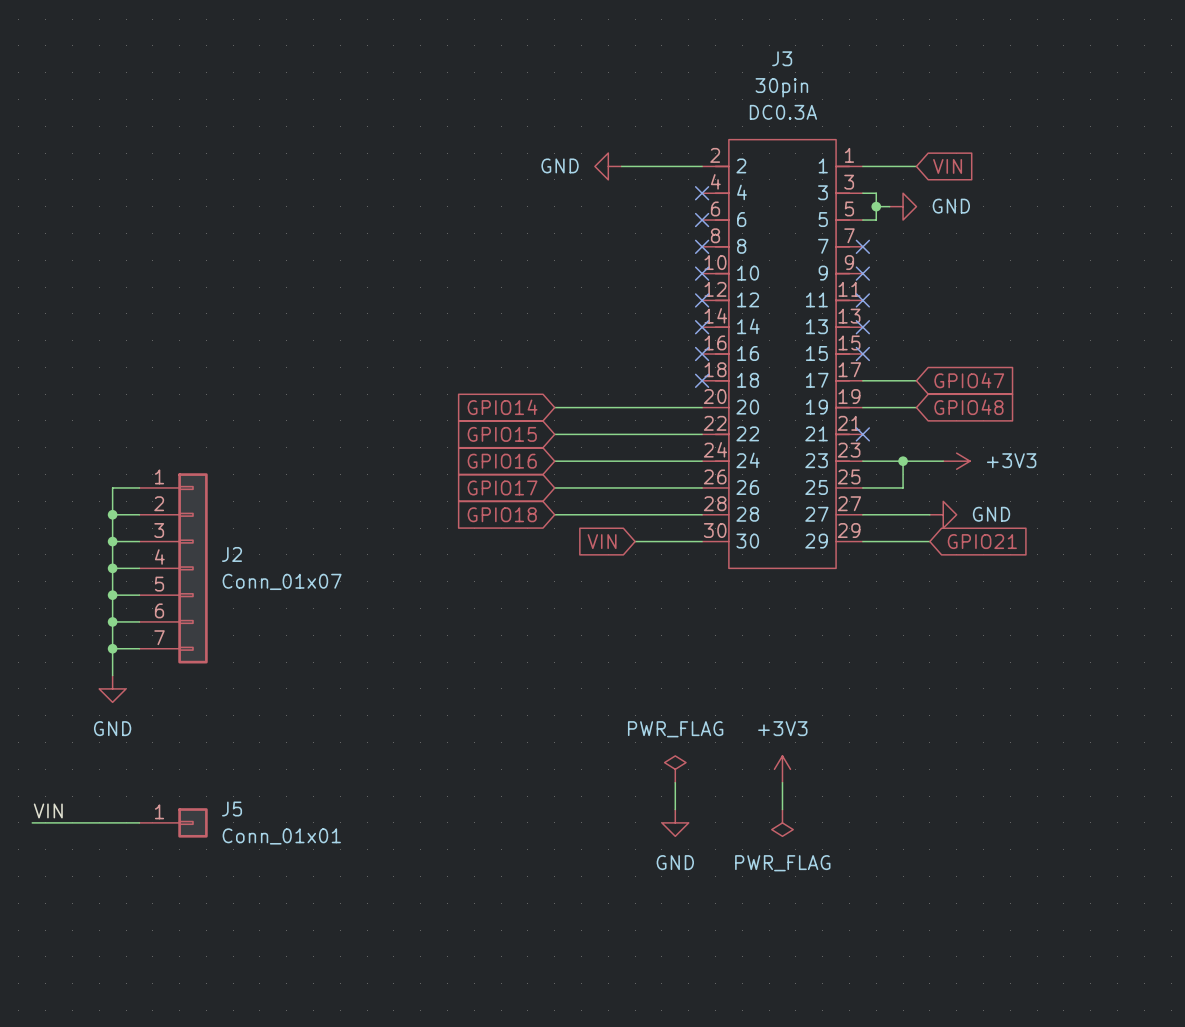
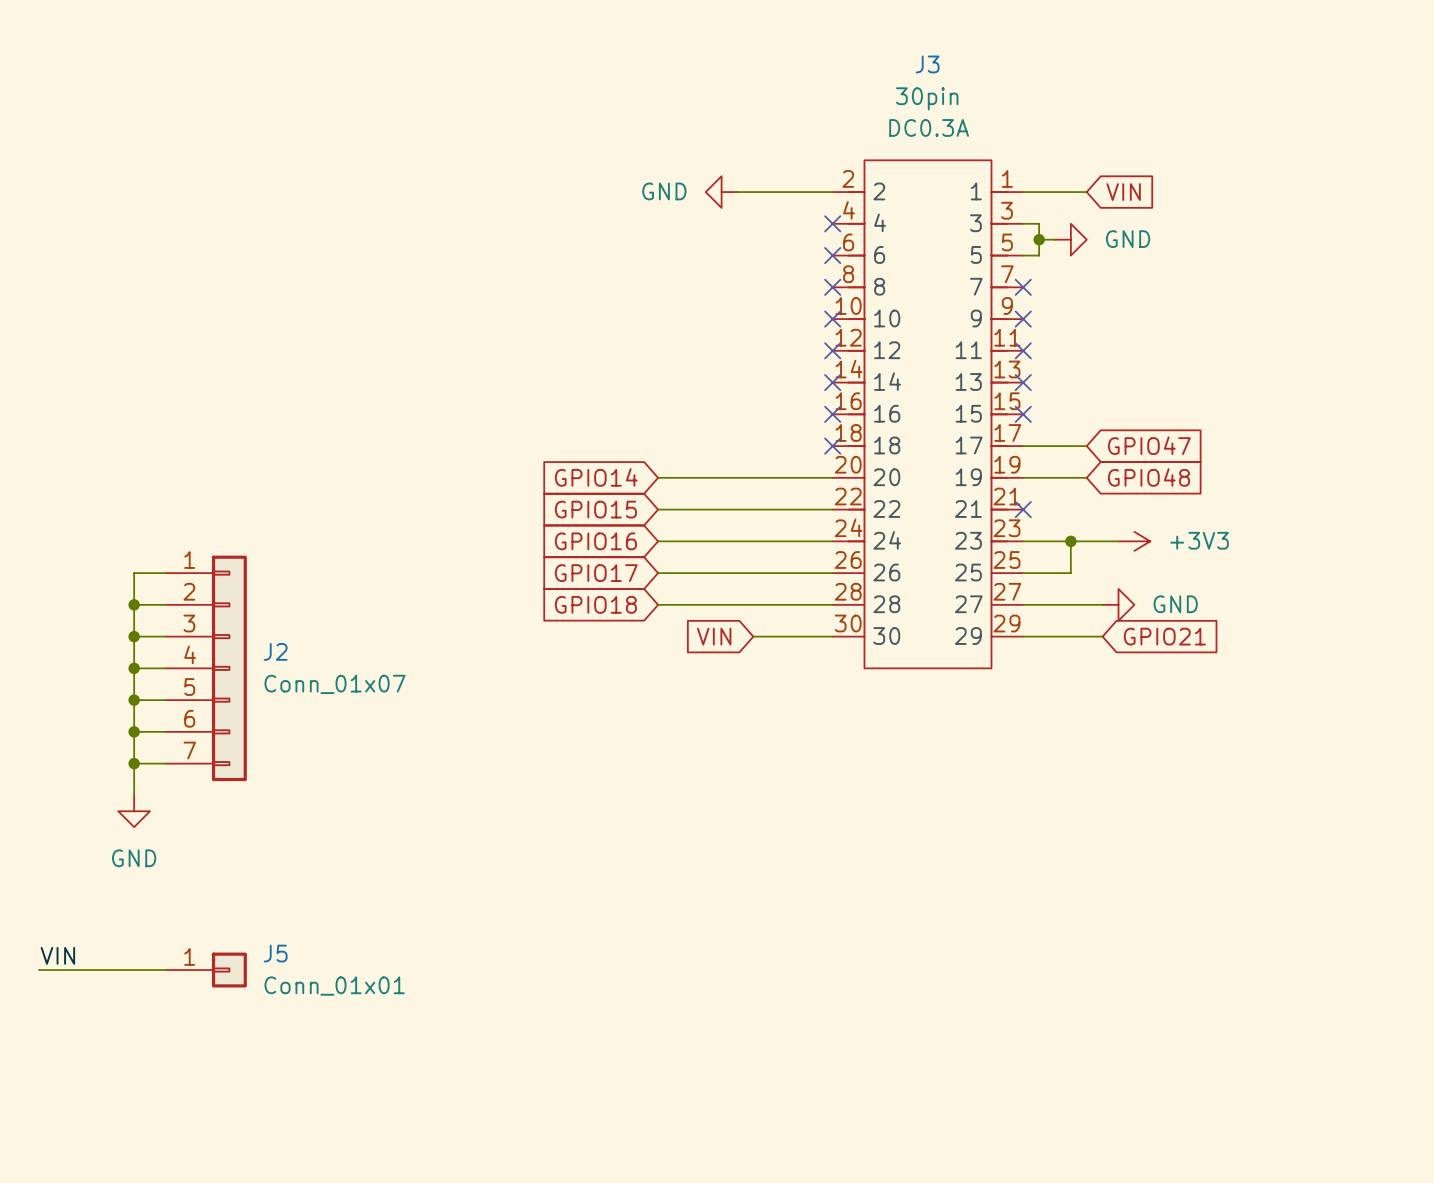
power symbol: PWR_FLAG (675, 769) -> none
power symbol: +3V3 (782, 769) -> none
wire: (675, 782) (675, 809) -> none
wire: (782, 782) (782, 809) -> none
power symbol: GND (675, 822) -> none
power symbol: PWR_FLAG (782, 822) -> none

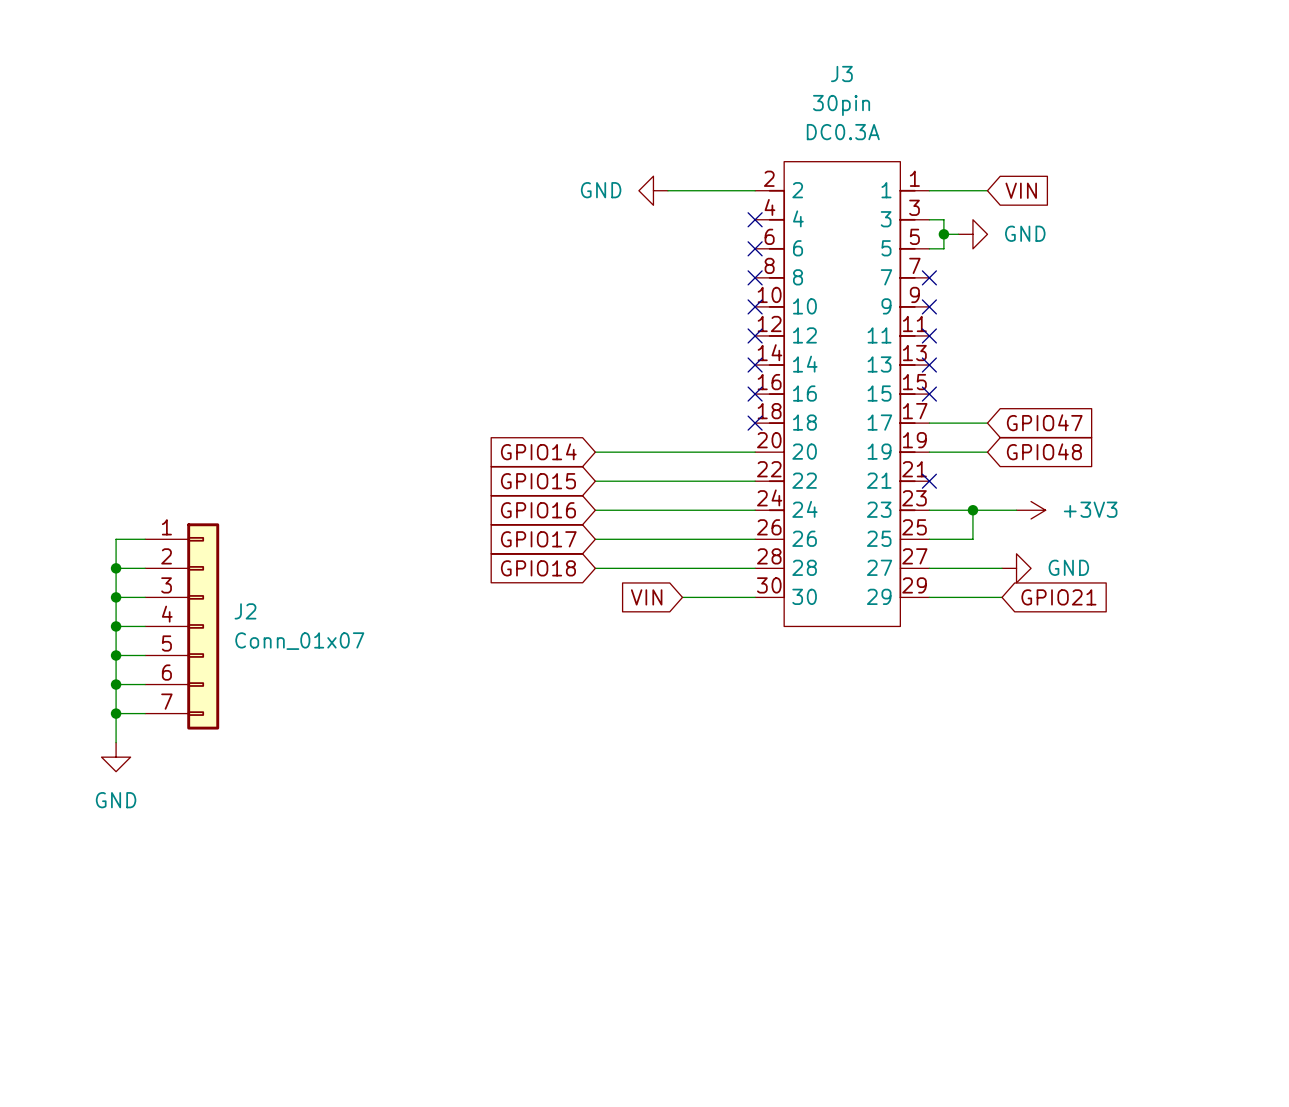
label: VIN (57, 955) -> none
wire: (38, 970) (165, 970) -> none
J5: Conn_01x01 (206, 970) -> none

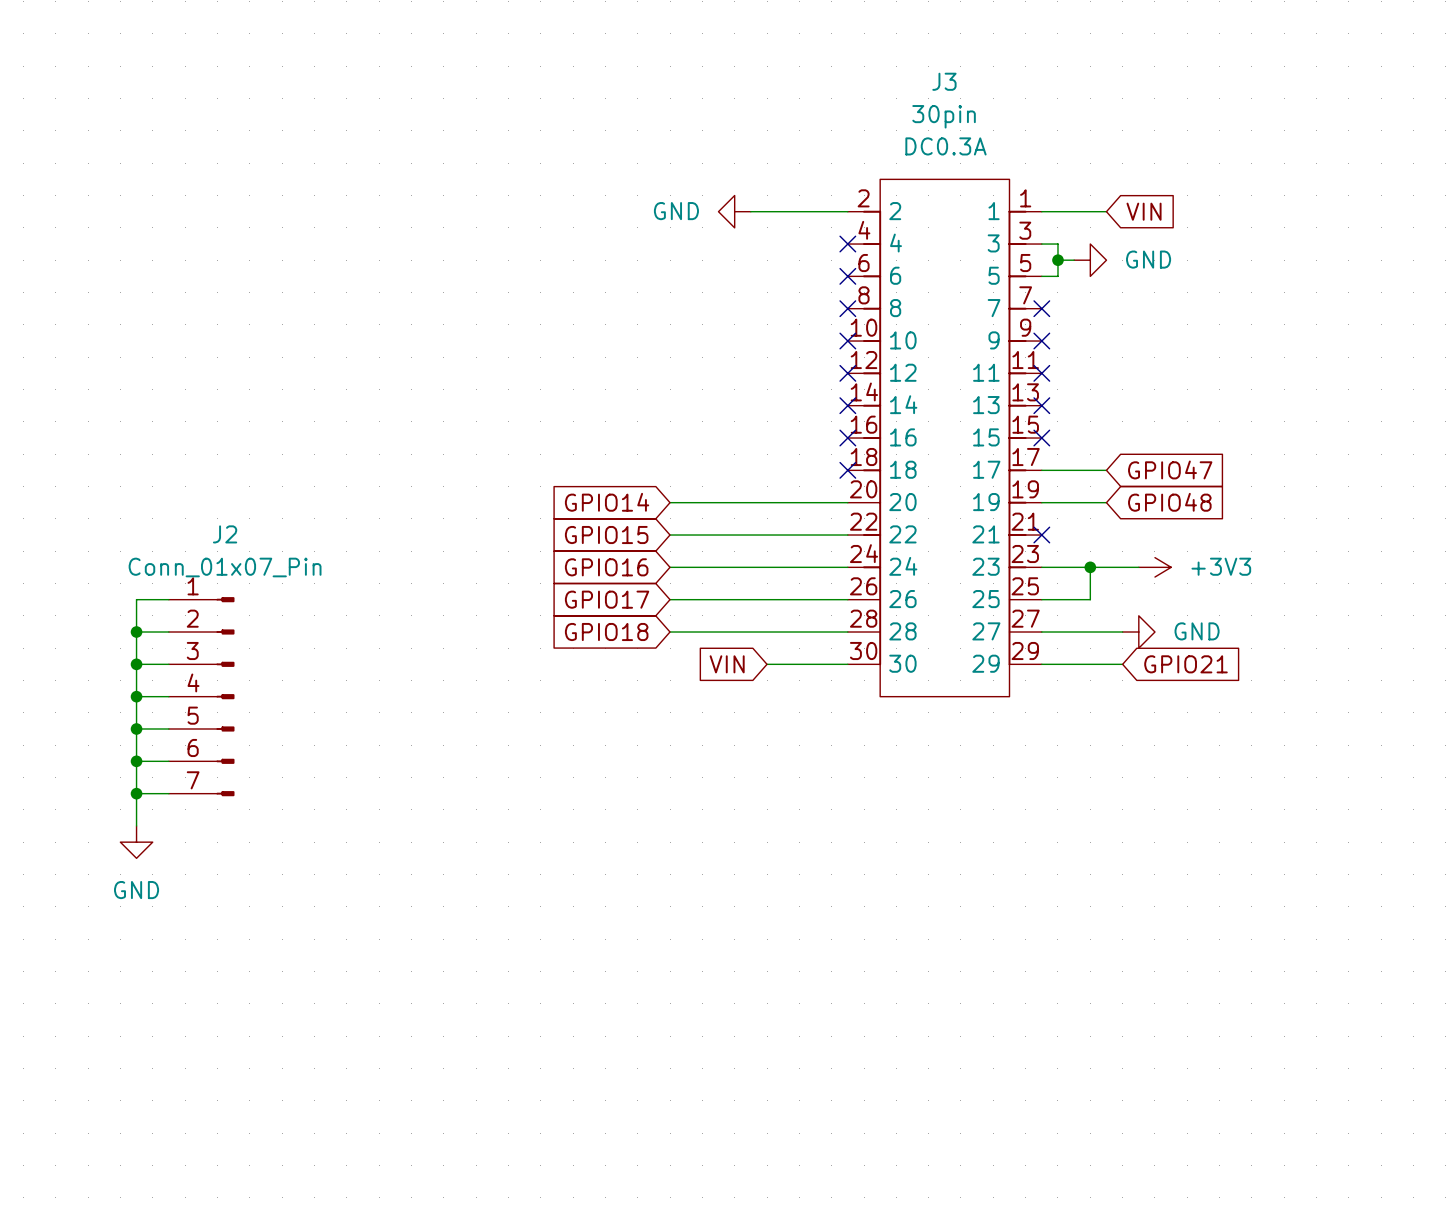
J2 symbol: [145, 523, 220, 730] -> [168, 597, 235, 797]
J2 name position: J2 (245, 611) -> J2 (225, 534)
J2 value: Conn_01x07 (299, 641) -> Conn_01x07_Pin (225, 567)

